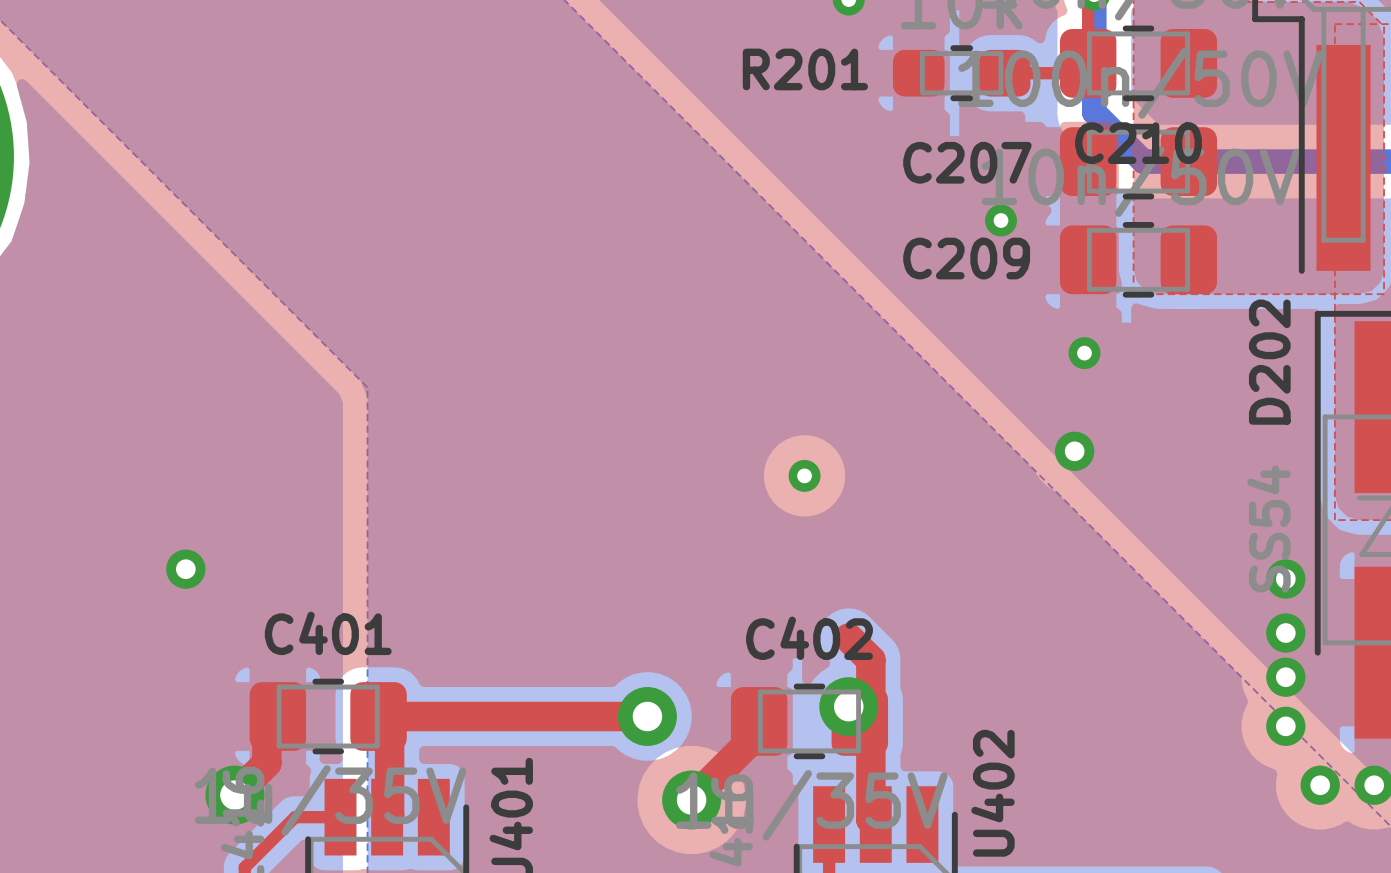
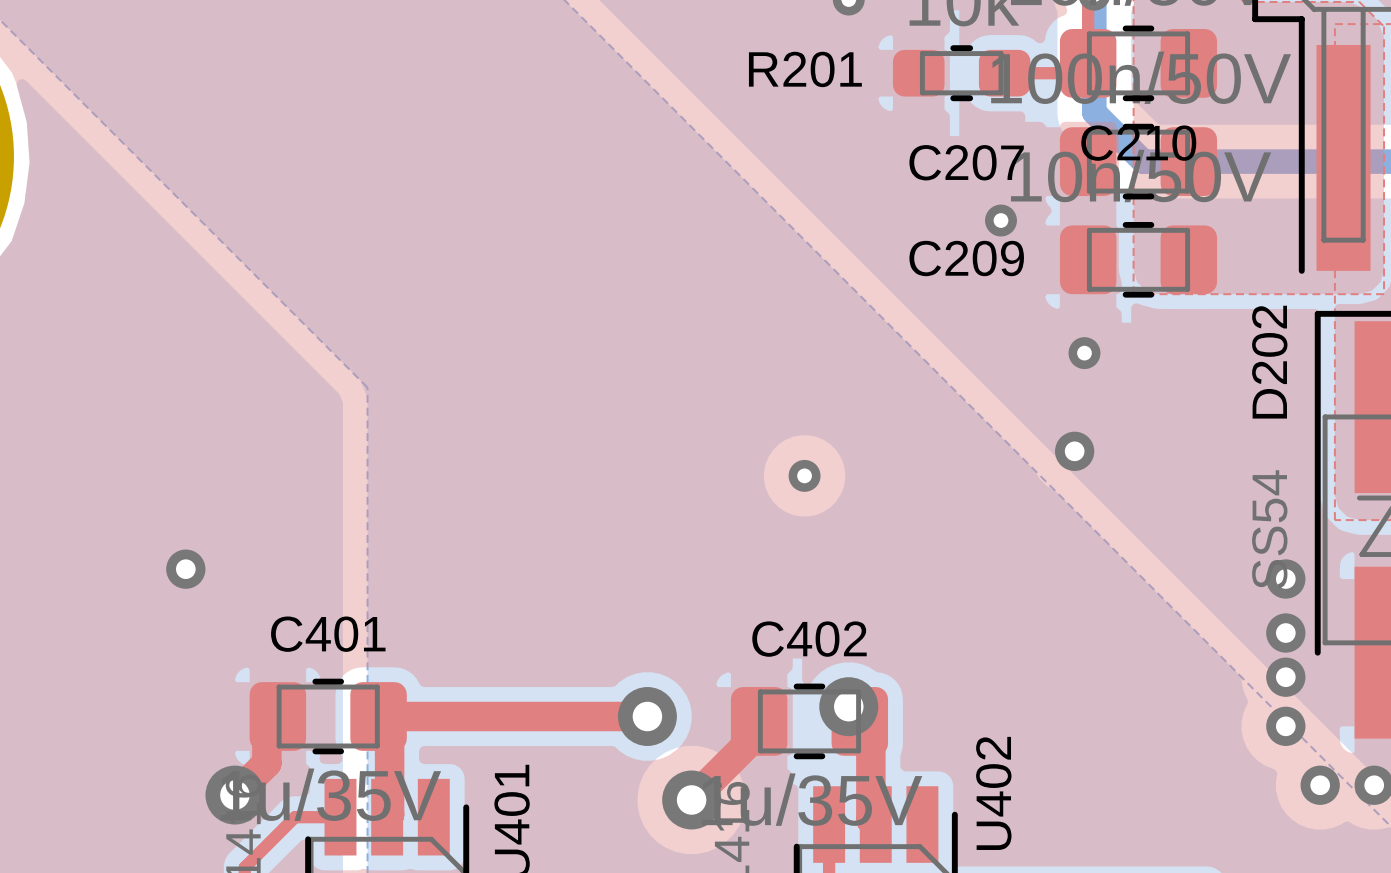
top track: (848, 637) (870, 660) (870, 721) -> none

